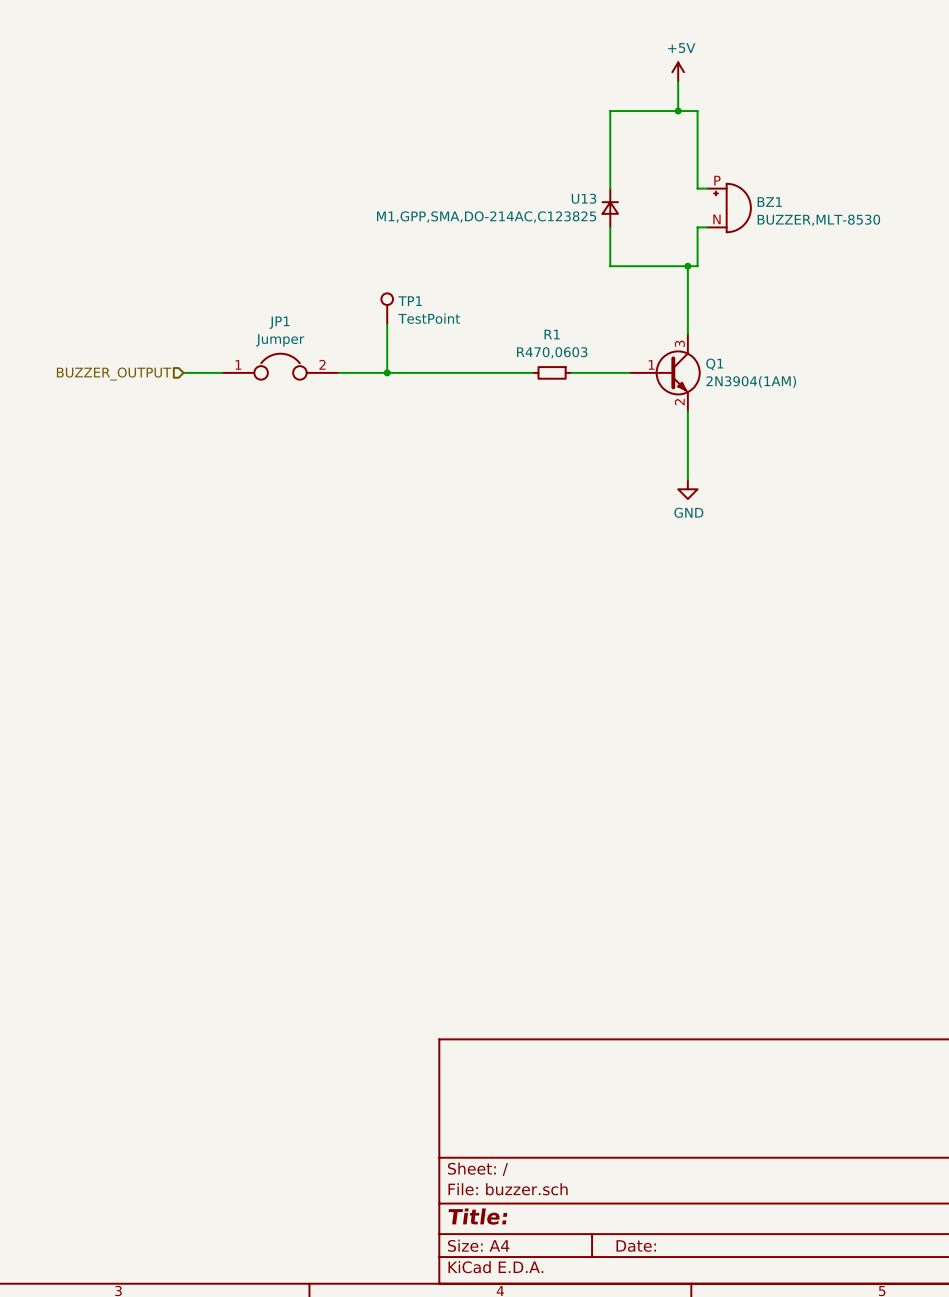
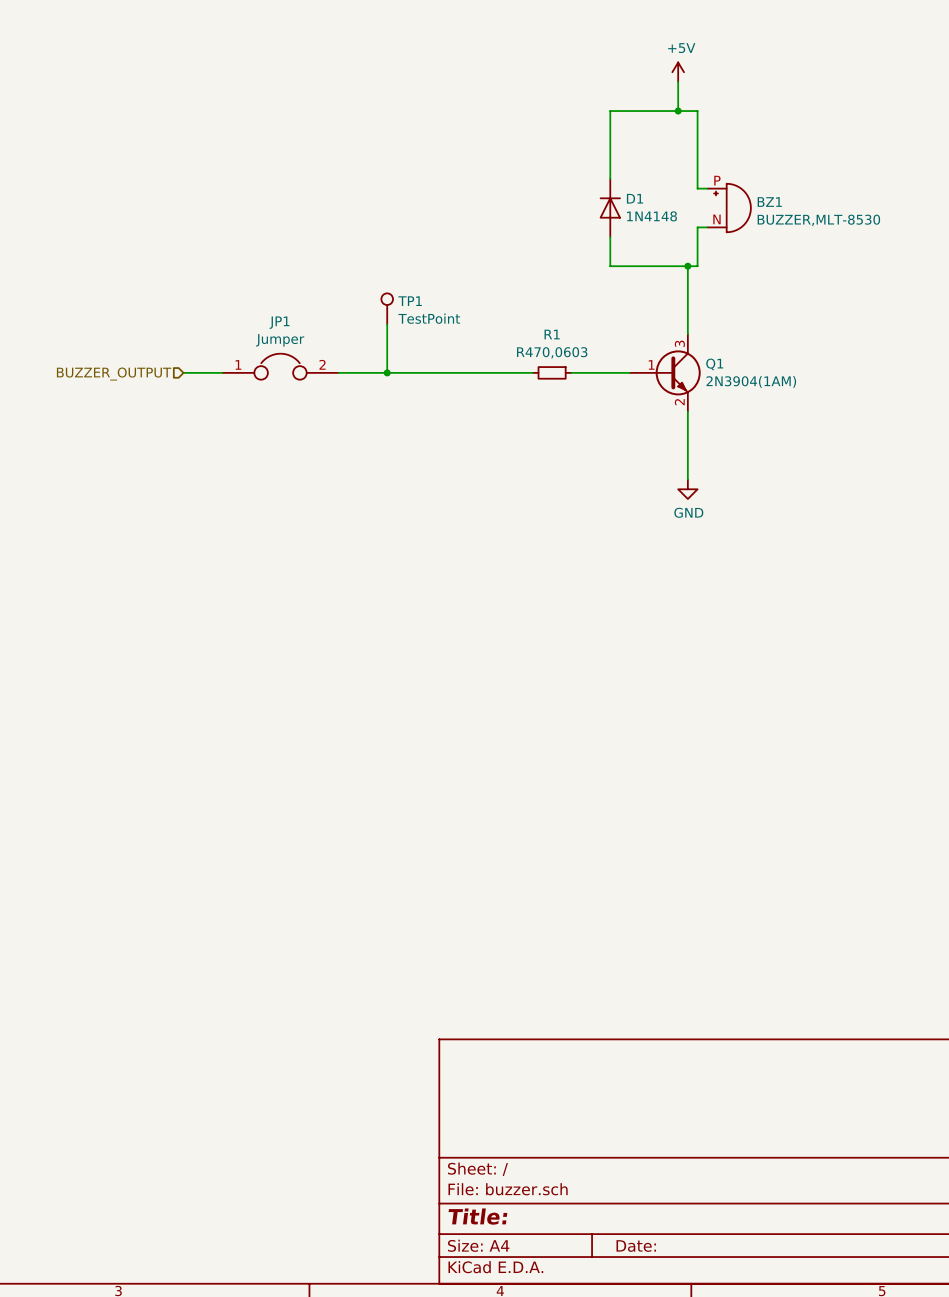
U13: M1,GPP,SMA,DO-214AC,C123825 (610, 208) -> none
D1: none -> 1N4148 (610, 208)

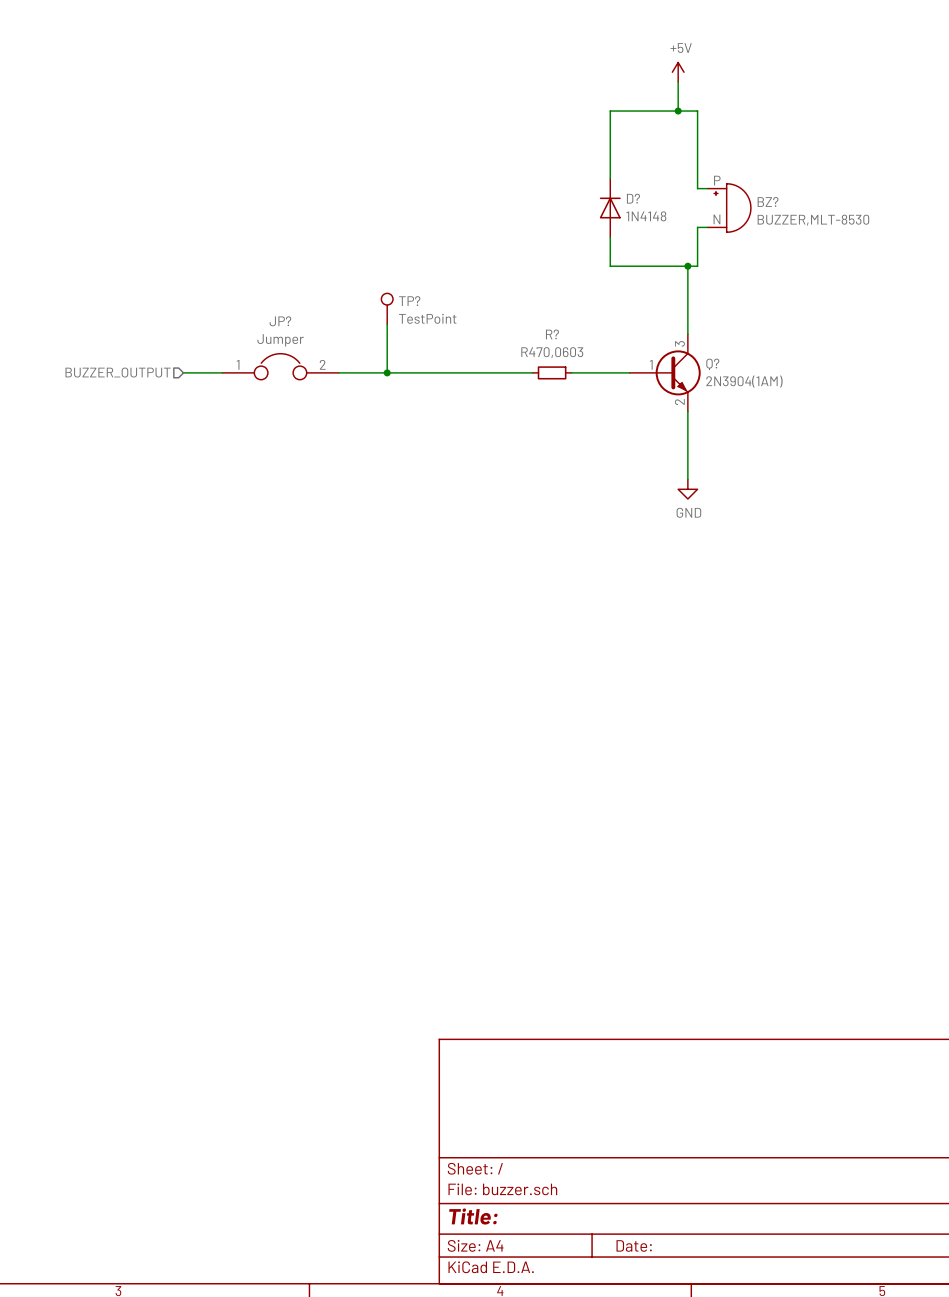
D1 name: D1 (635, 198) -> D? (633, 198)
BZ1 name: BZ1 (769, 202) -> BZ? (768, 201)
TP1 name: TP1 (410, 301) -> TP? (409, 301)
JP1 name: JP1 (279, 322) -> JP? (280, 321)
R1 name: R1 (552, 334) -> R? (552, 334)
Q1 name: Q1 (714, 364) -> Q? (712, 364)

